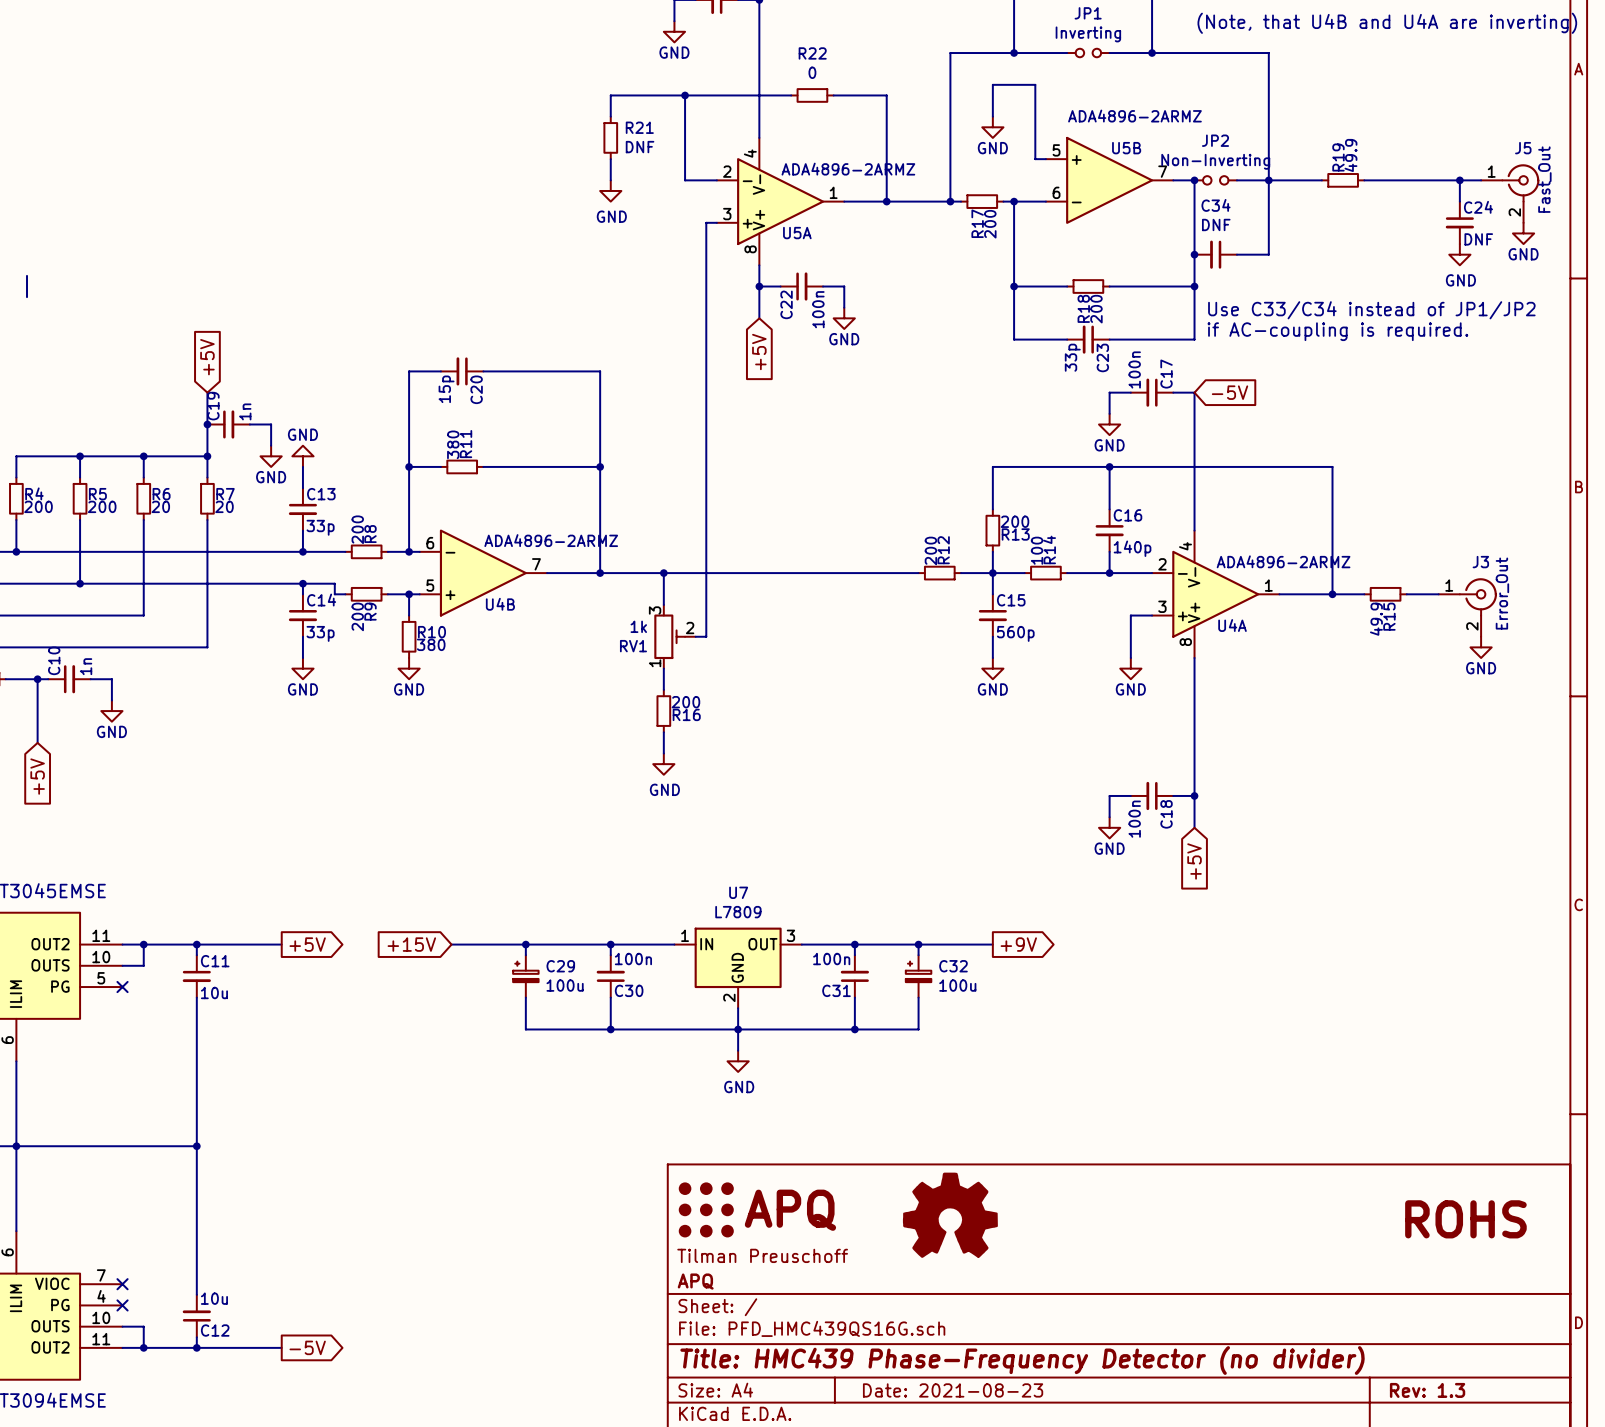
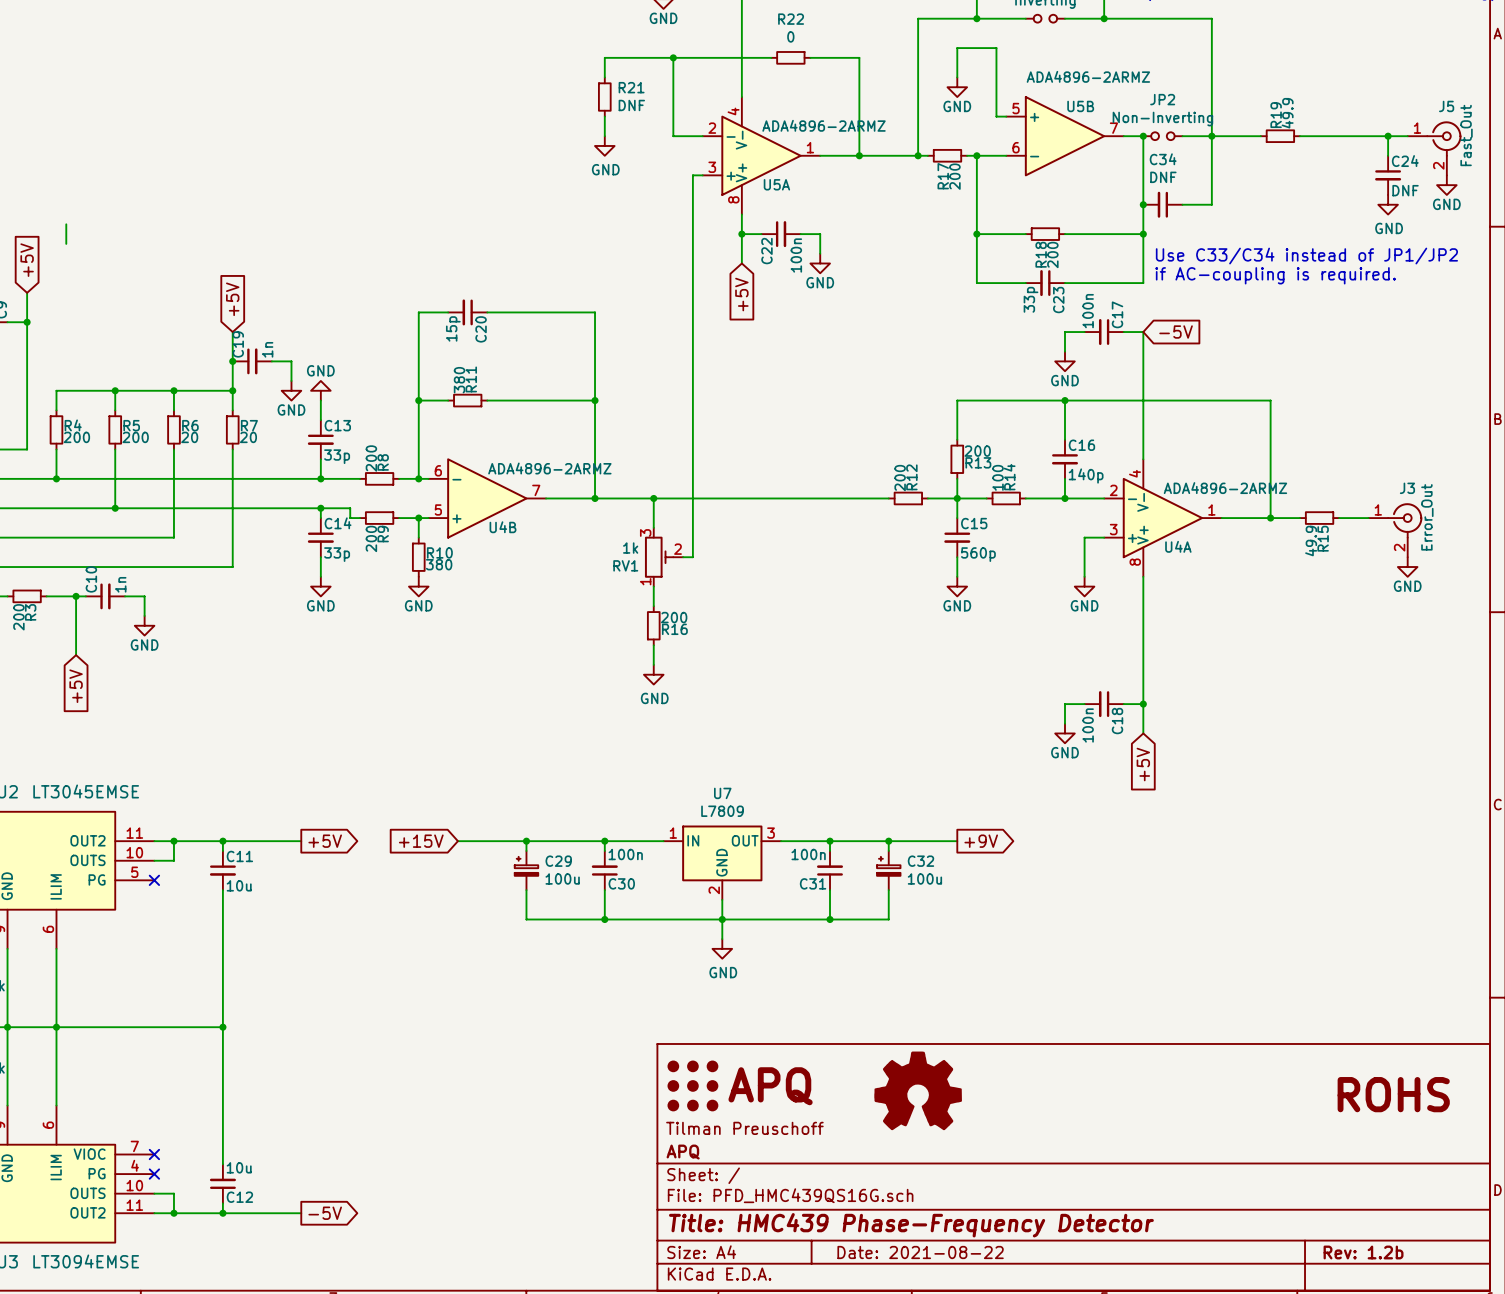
title block: Title: HMC439 Phase-Frequency Detector (no divider) (1022, 1360) -> Title: HMC439 Phase-Frequency Detector (911, 1225)
title block: Date: 2021-08-23 (953, 1390) -> Date: 2021-08-22 (920, 1252)
title block: Rev: 1.3 (1427, 1390) -> Rev: 1.2b (1363, 1252)

